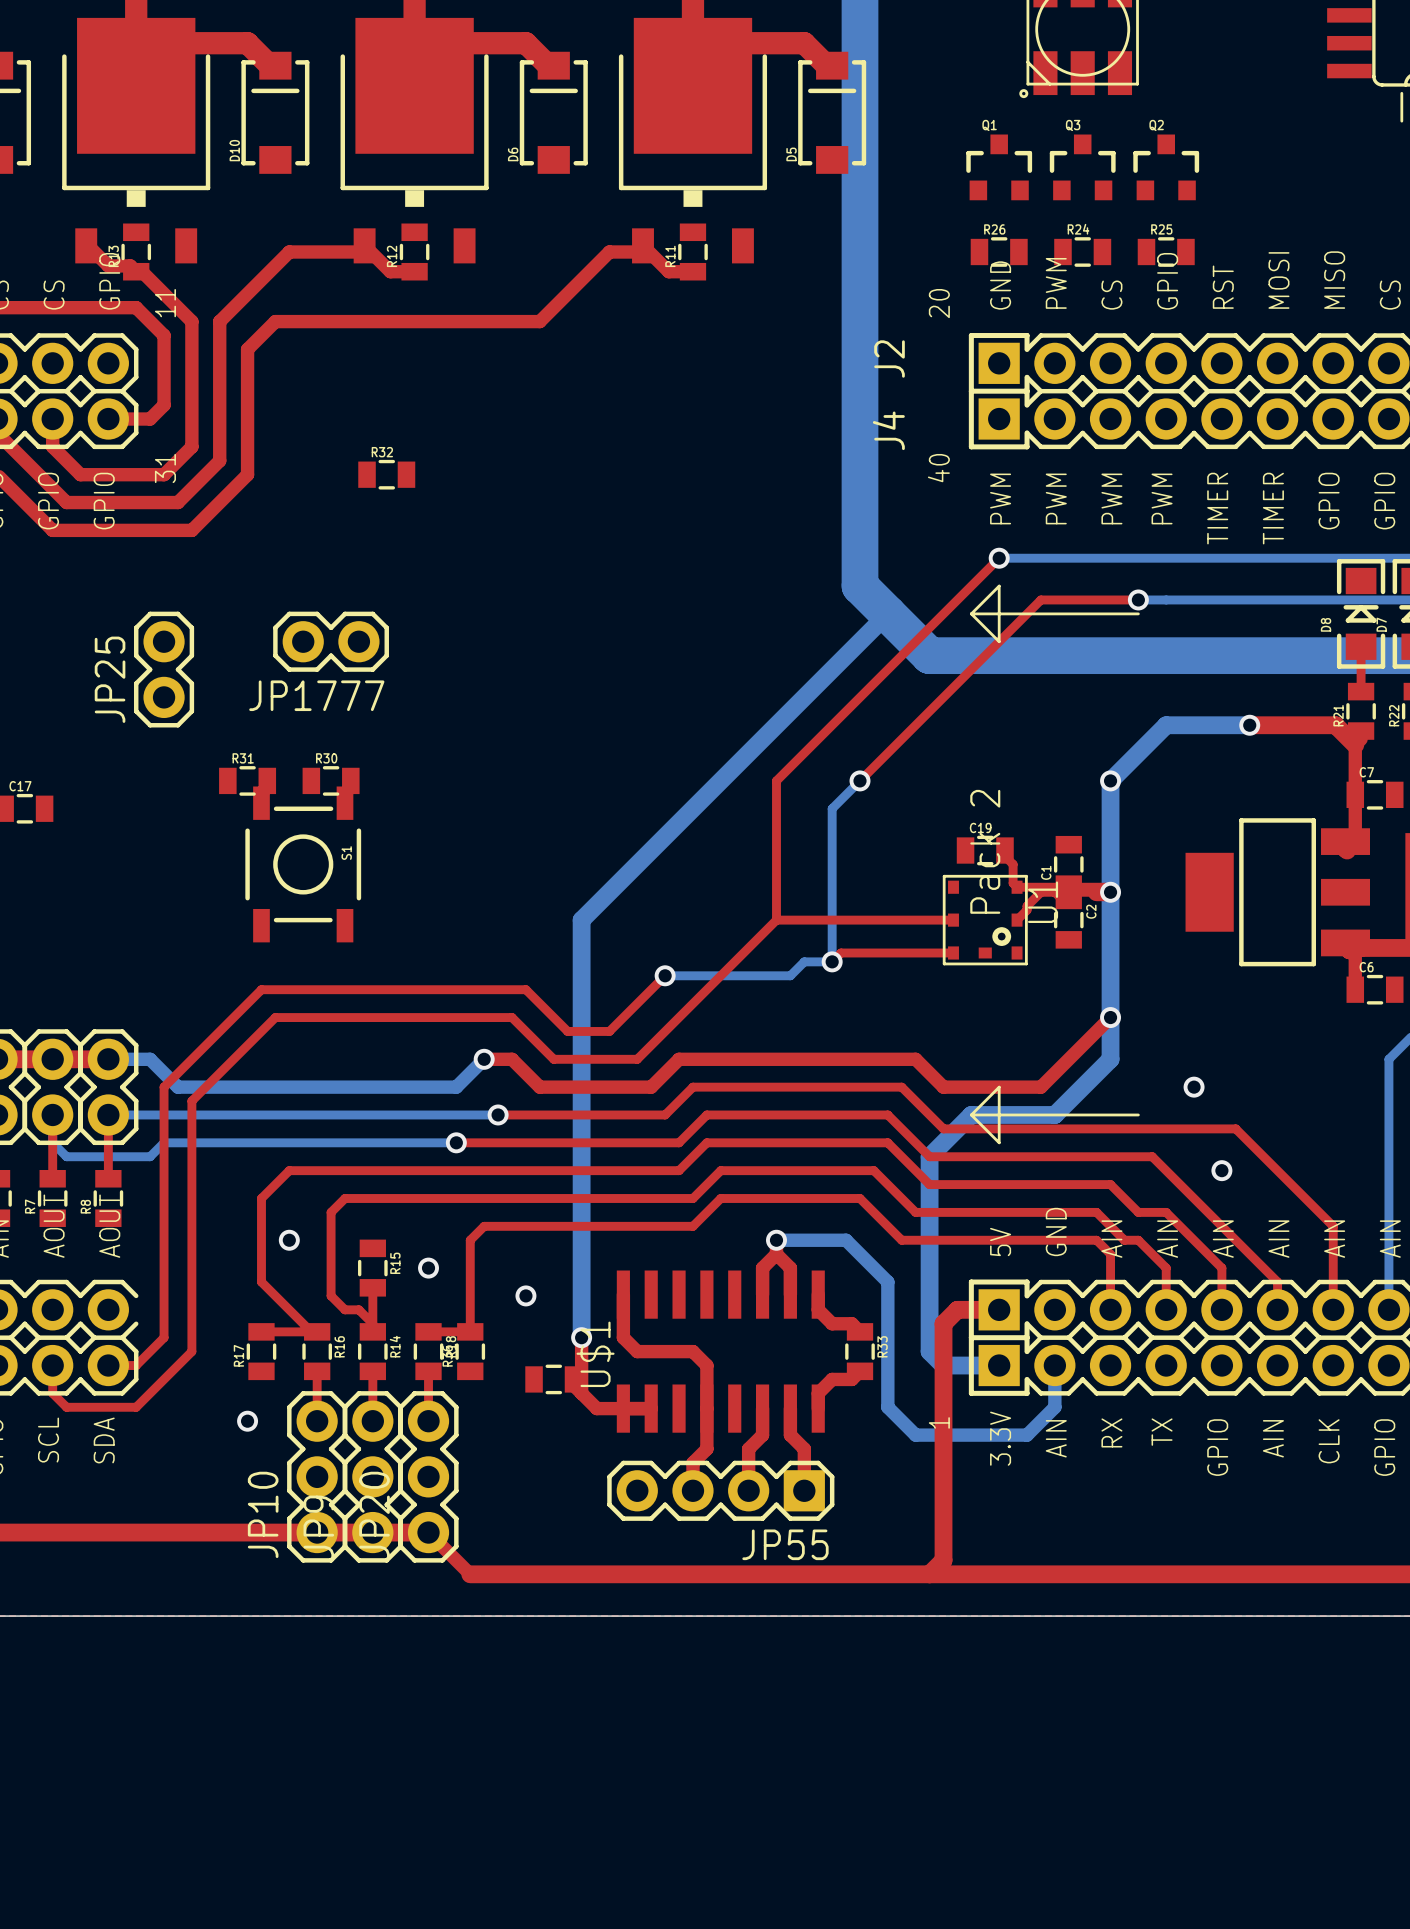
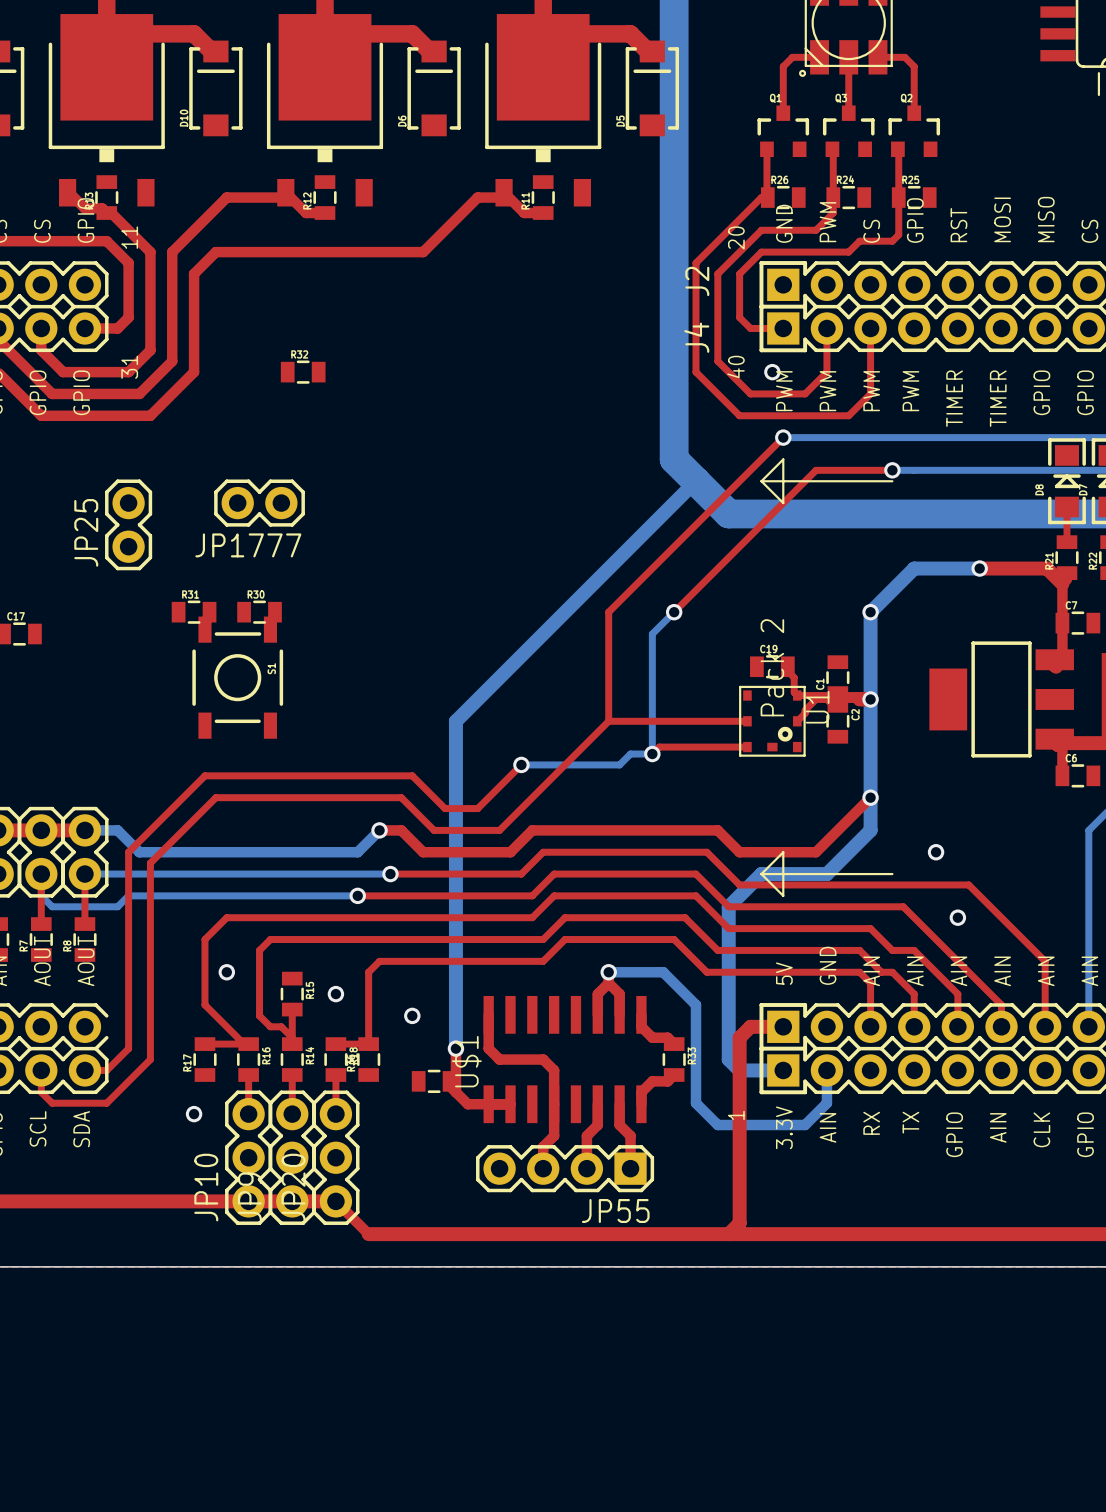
top track: none -> (819, 57) (792, 57) (783, 66) (783, 113)
top track: none -> (848, 57) (848, 113)
top track: none -> (877, 57) (904, 57) (914, 66) (914, 113)
top track: none -> (766, 149) (767, 197) (761, 197) (696, 263) (696, 372) (739, 415) (848, 415) (870, 393) (870, 328)
top track: none -> (832, 149) (833, 213) (816, 230) (761, 230) (717, 273) (717, 361) (750, 393) (805, 393) (826, 372) (826, 328)
top track: none -> (897, 149) (898, 234) (892, 241) (859, 241) (848, 252) (761, 252) (739, 273) (739, 317) (750, 328) (783, 328)
via: none -> (772, 372)

